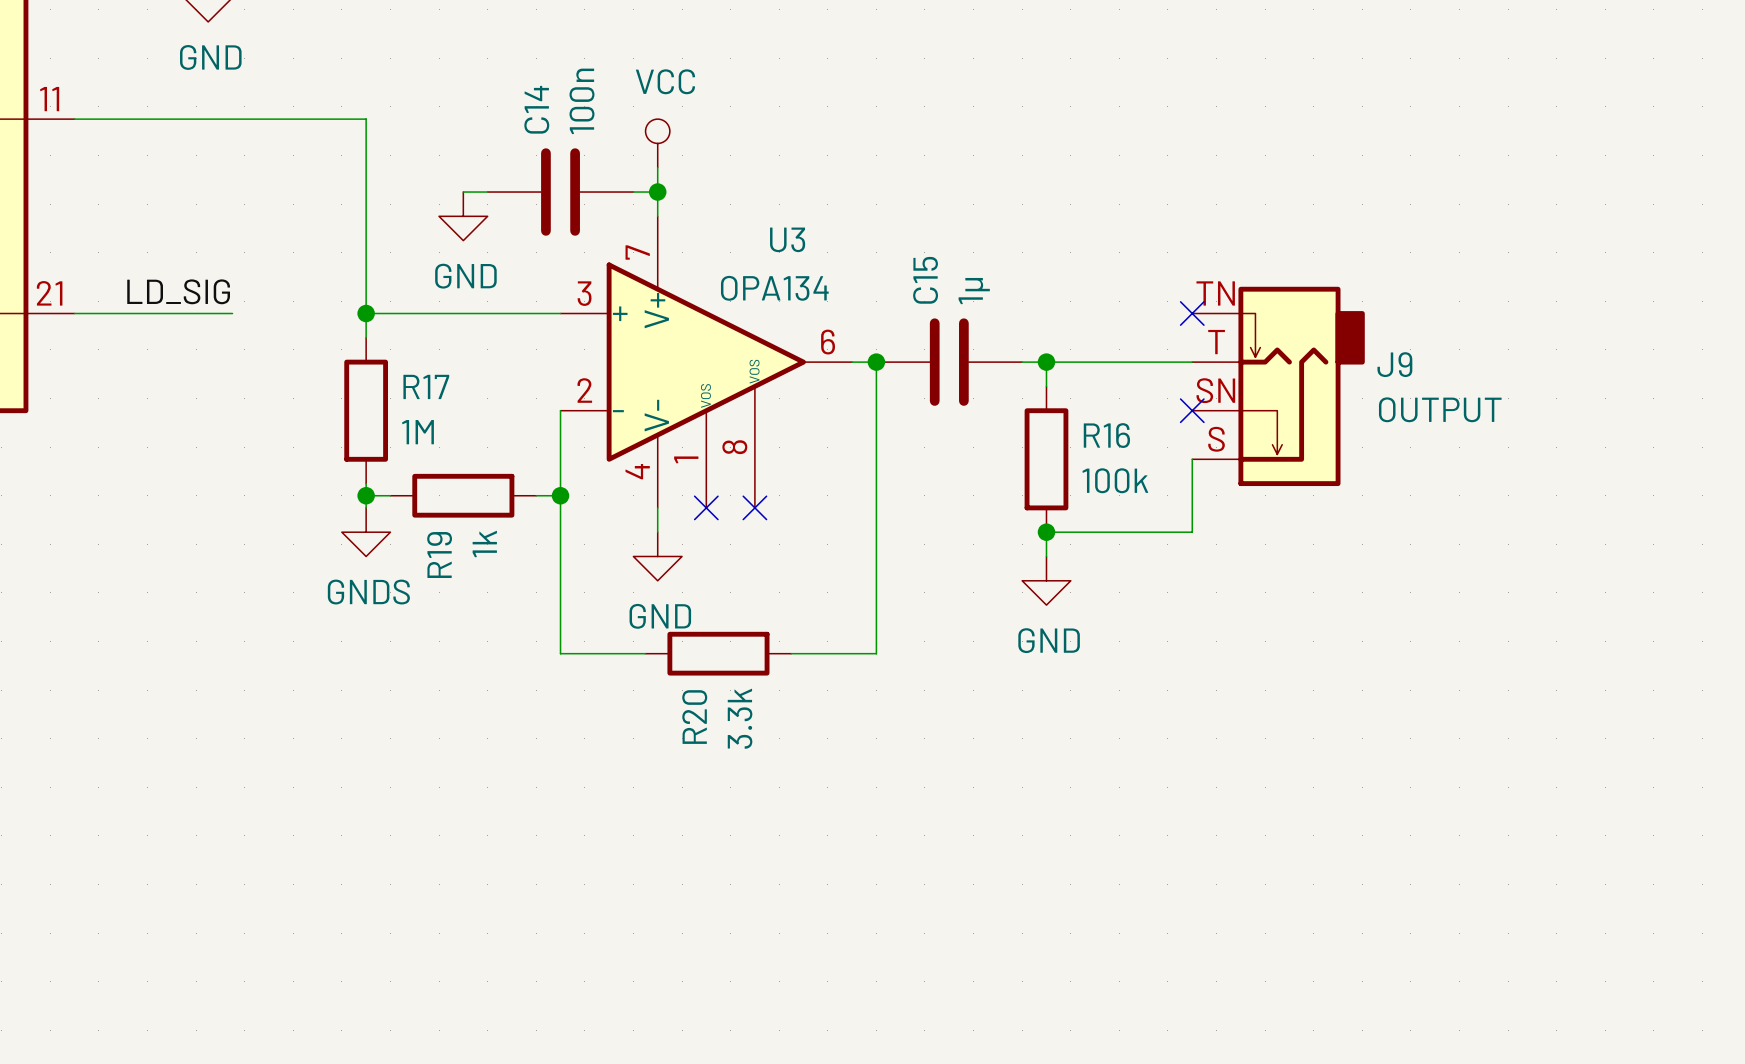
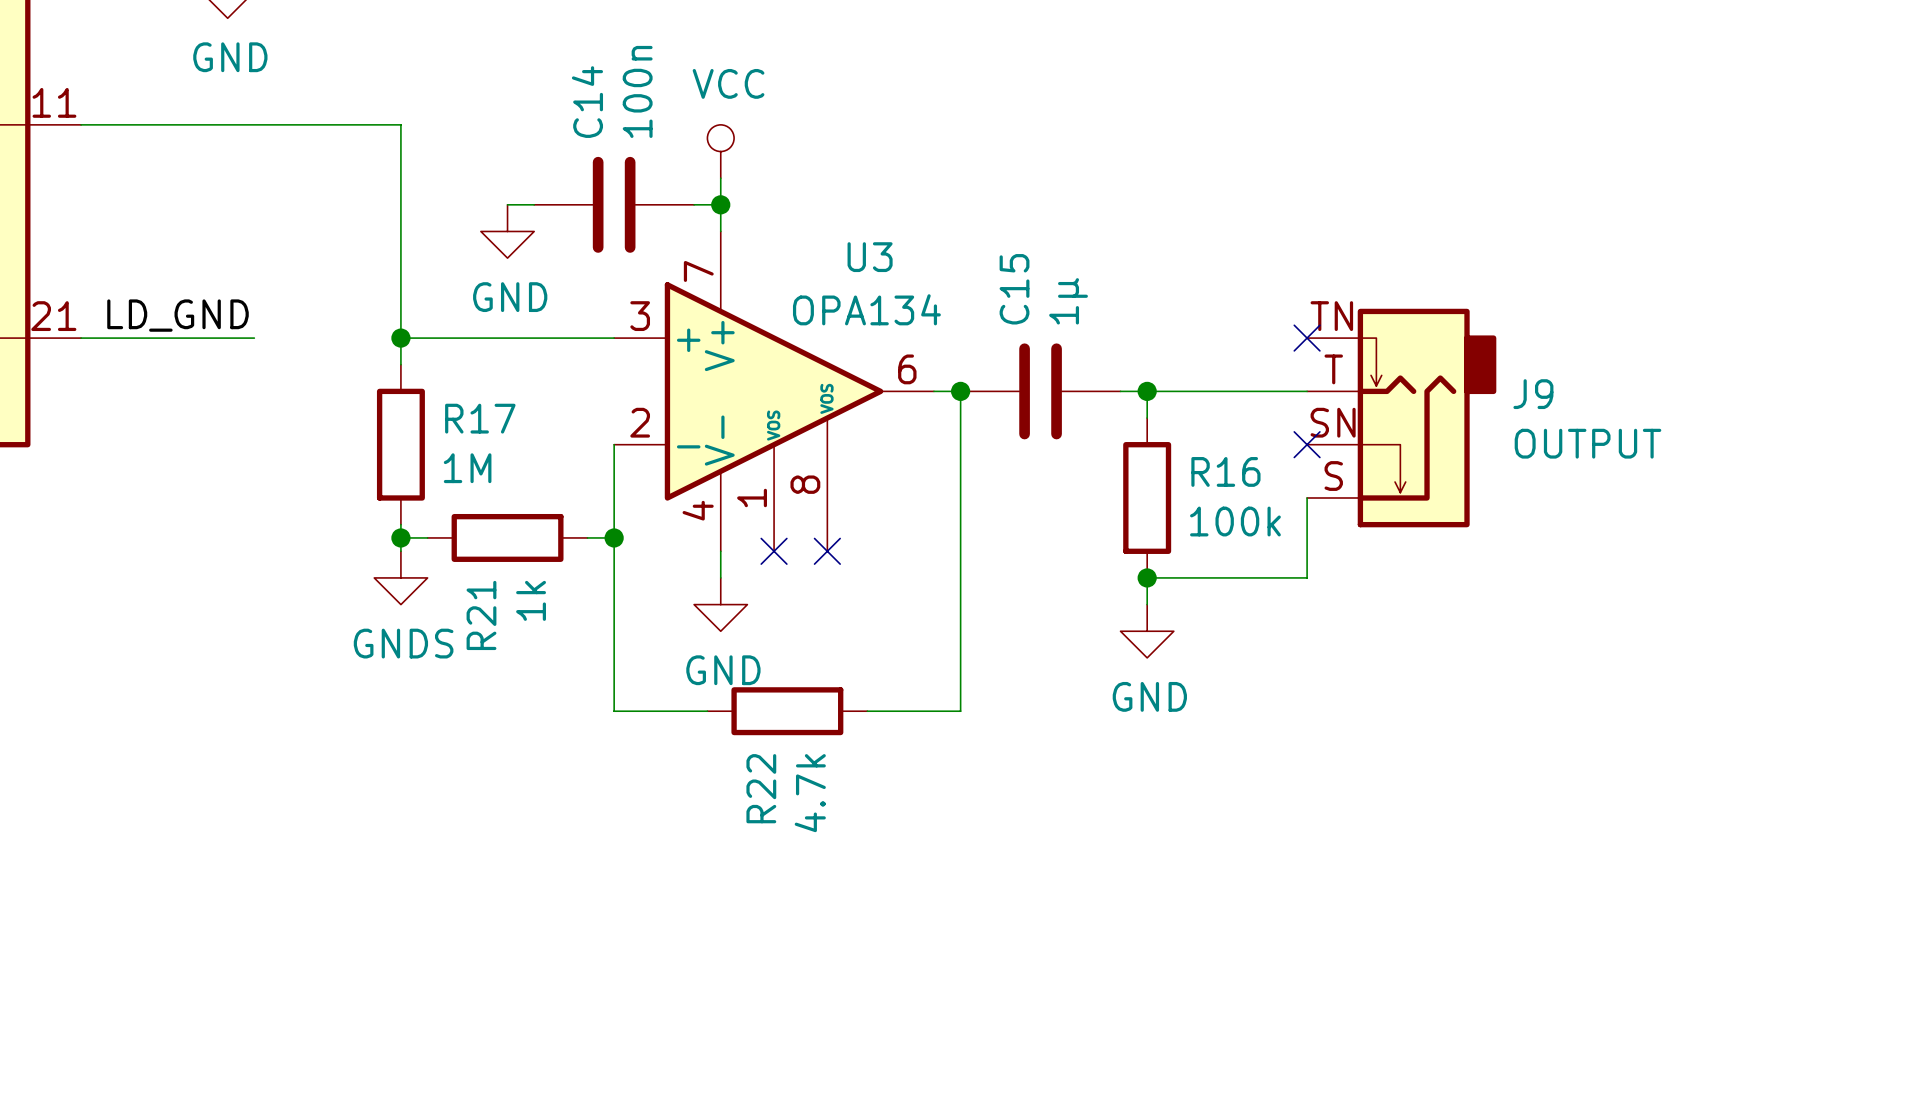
label: LD_SIG (178, 291) -> LD_GND (178, 315)
R19 name: R19 (439, 555) -> R21 (481, 615)
R20 name: R20 (694, 717) -> R22 (761, 788)
R20 value: 3.3k (740, 718) -> 4.7k (810, 793)

